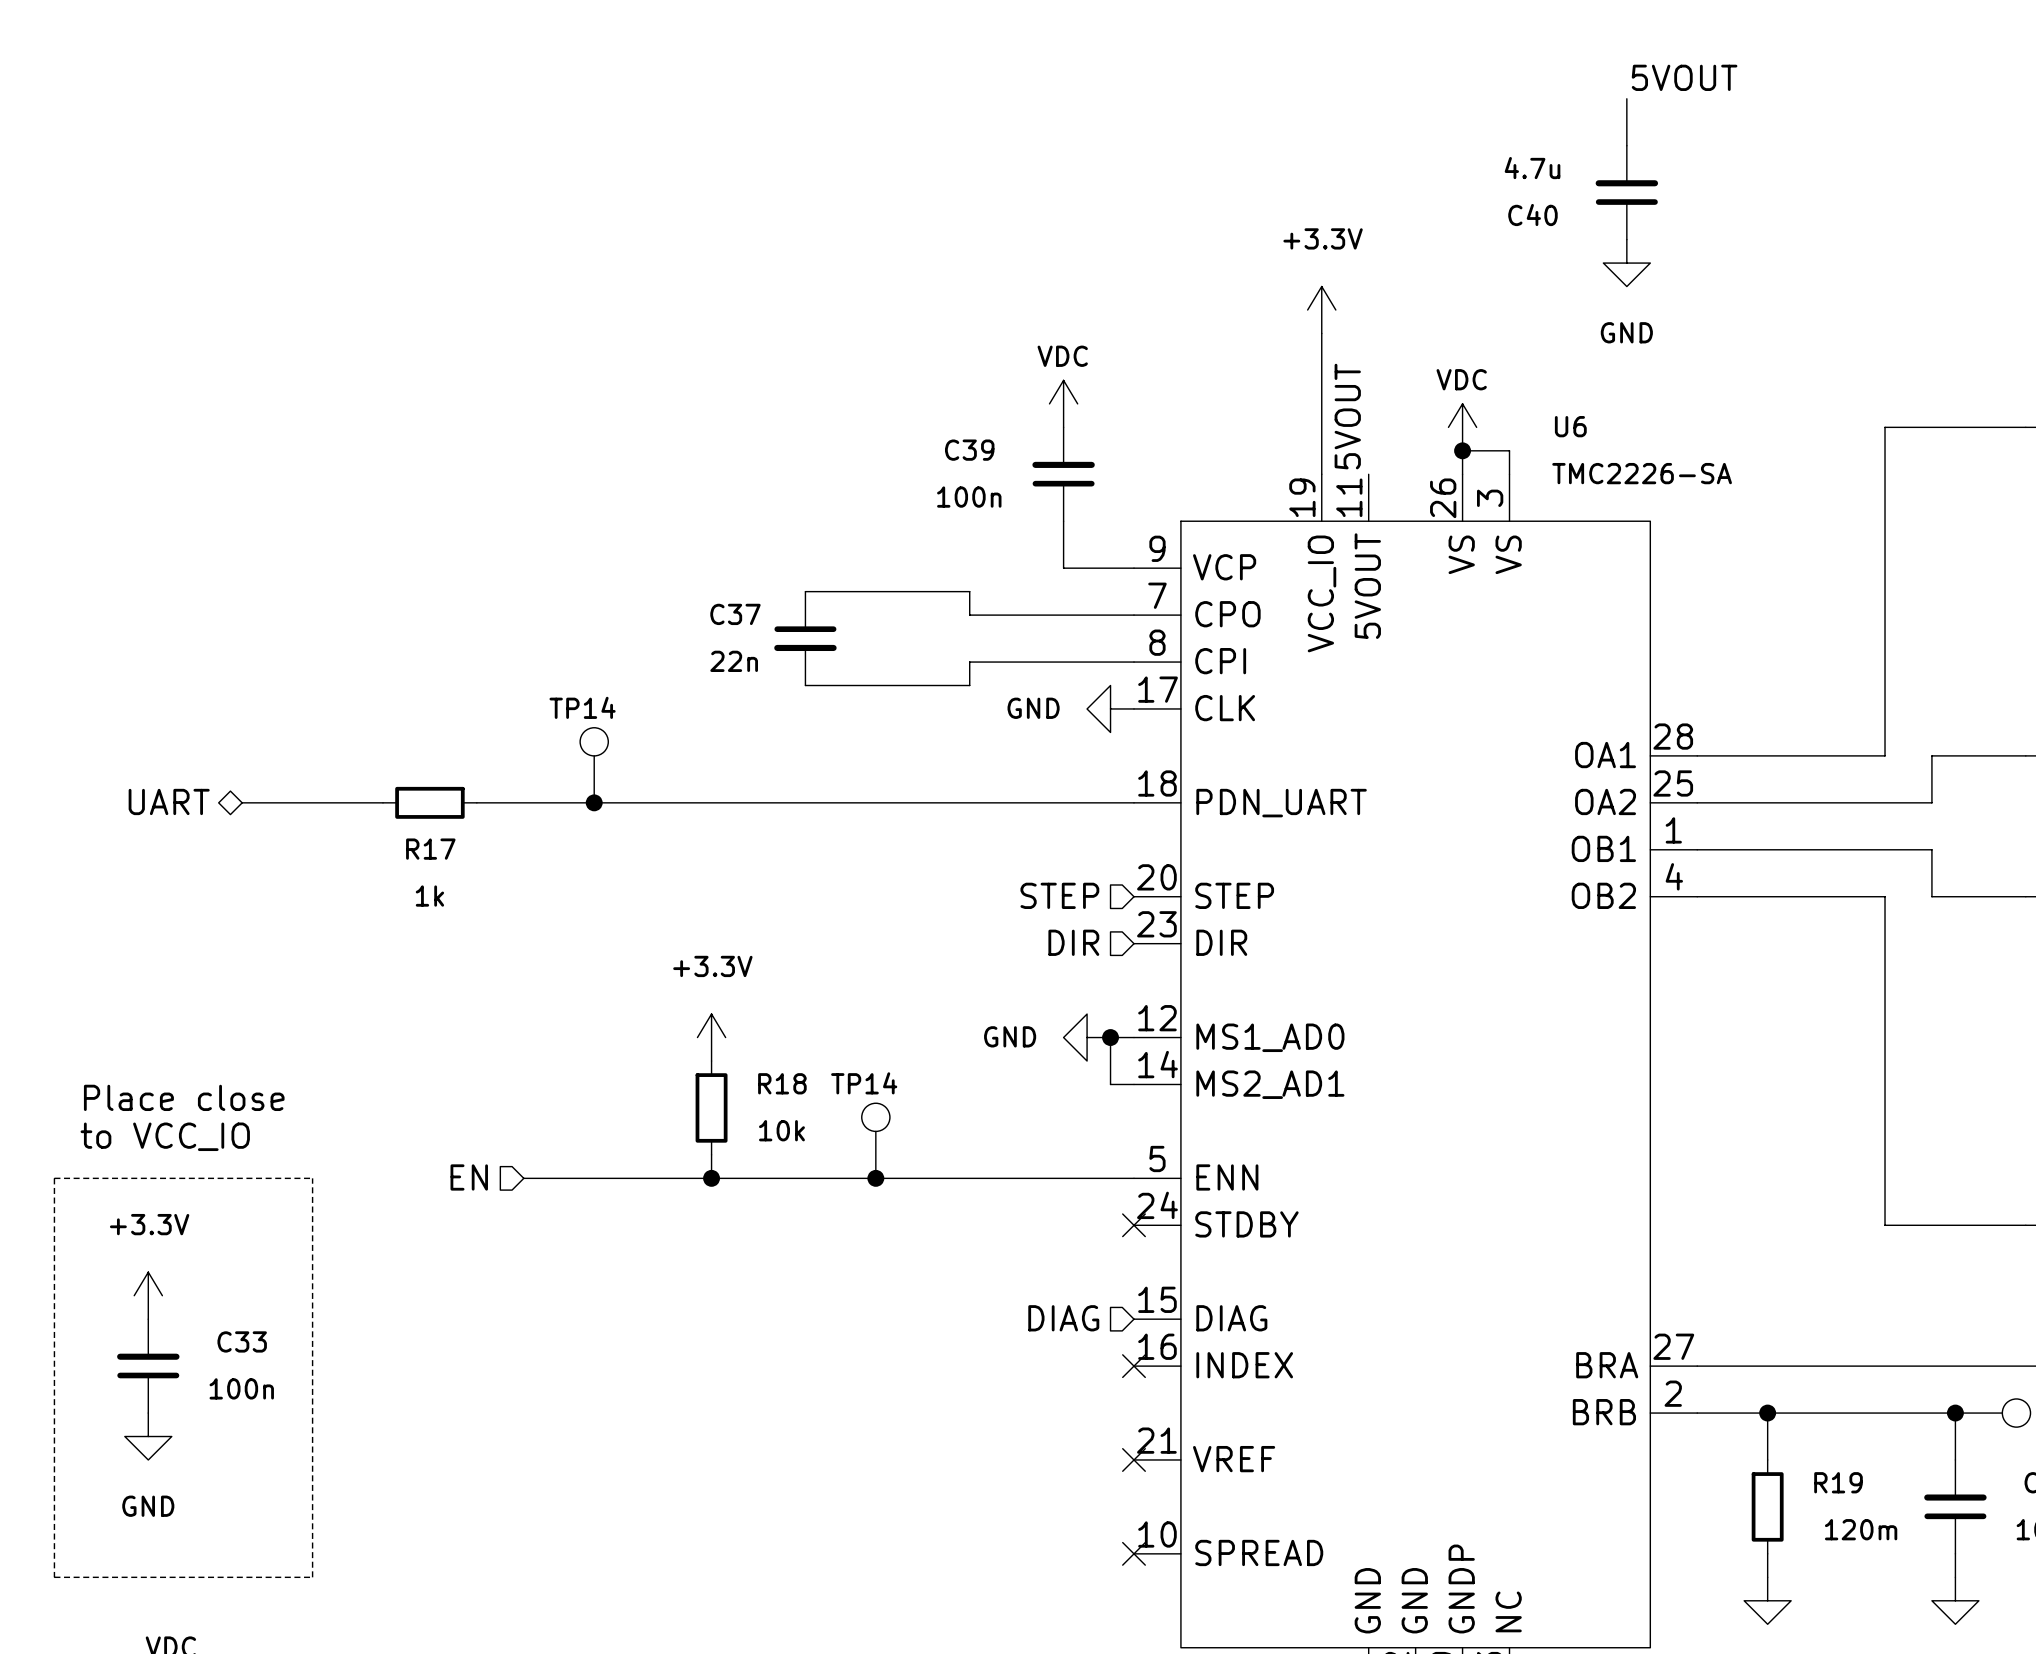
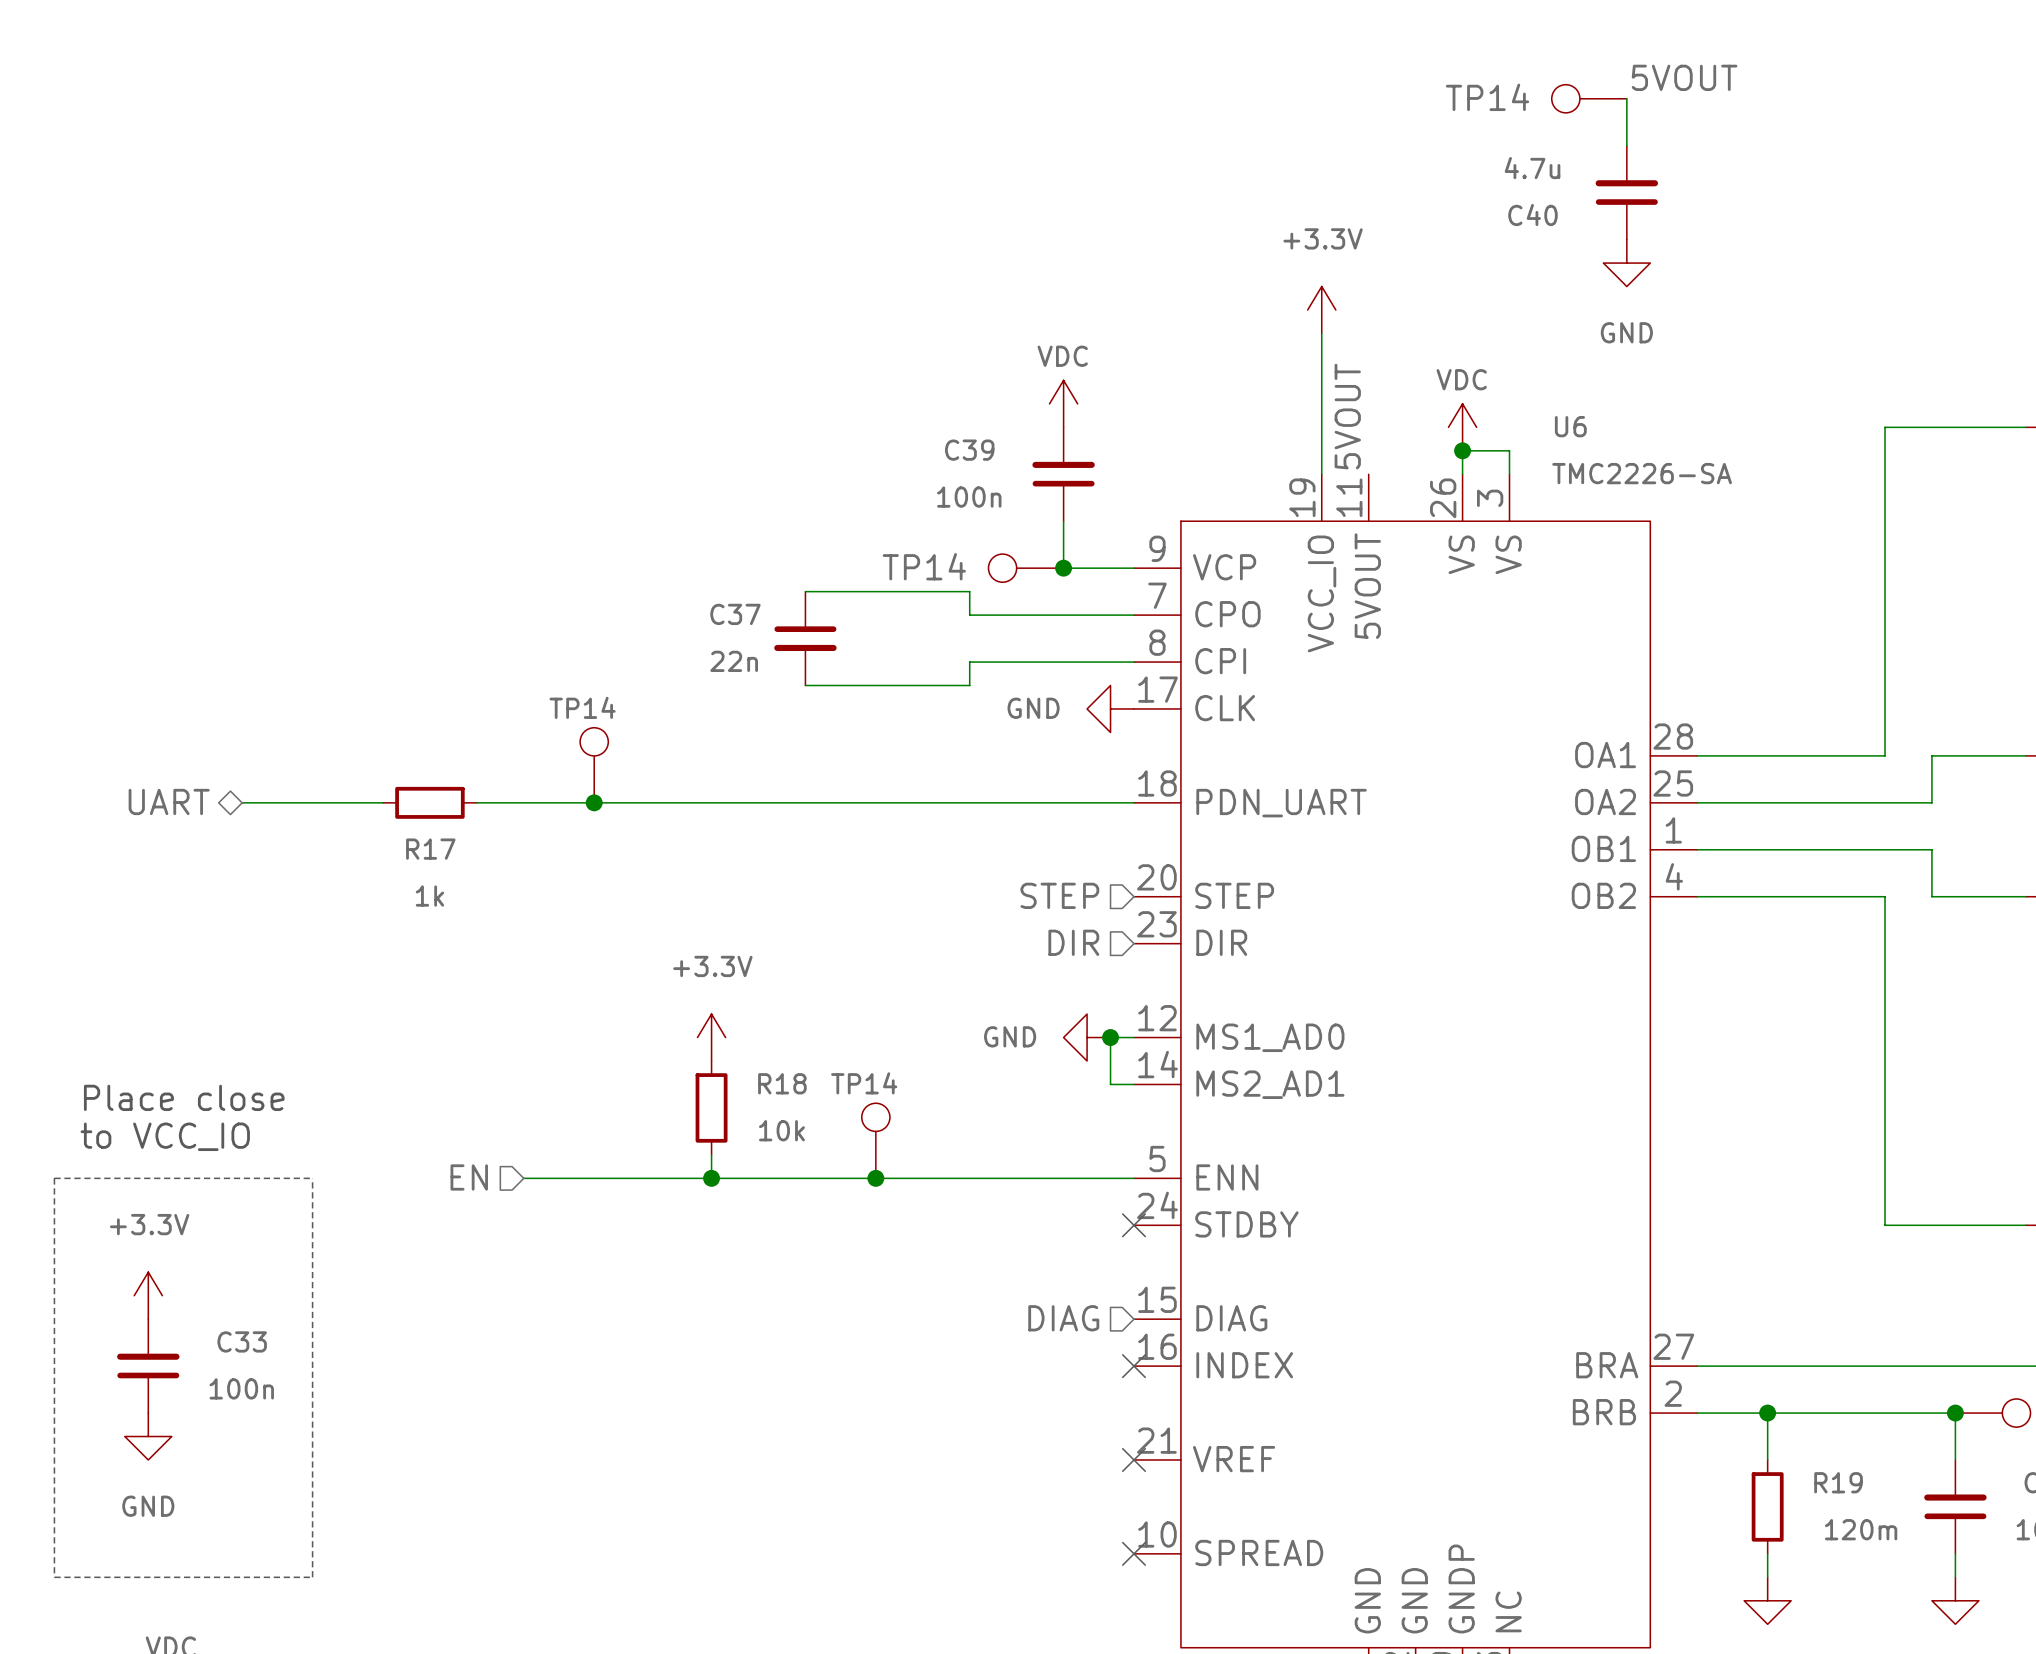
TP14: none -> (1589, 98)
TP14: none -> (1026, 568)
junction: none -> (1063, 568)

